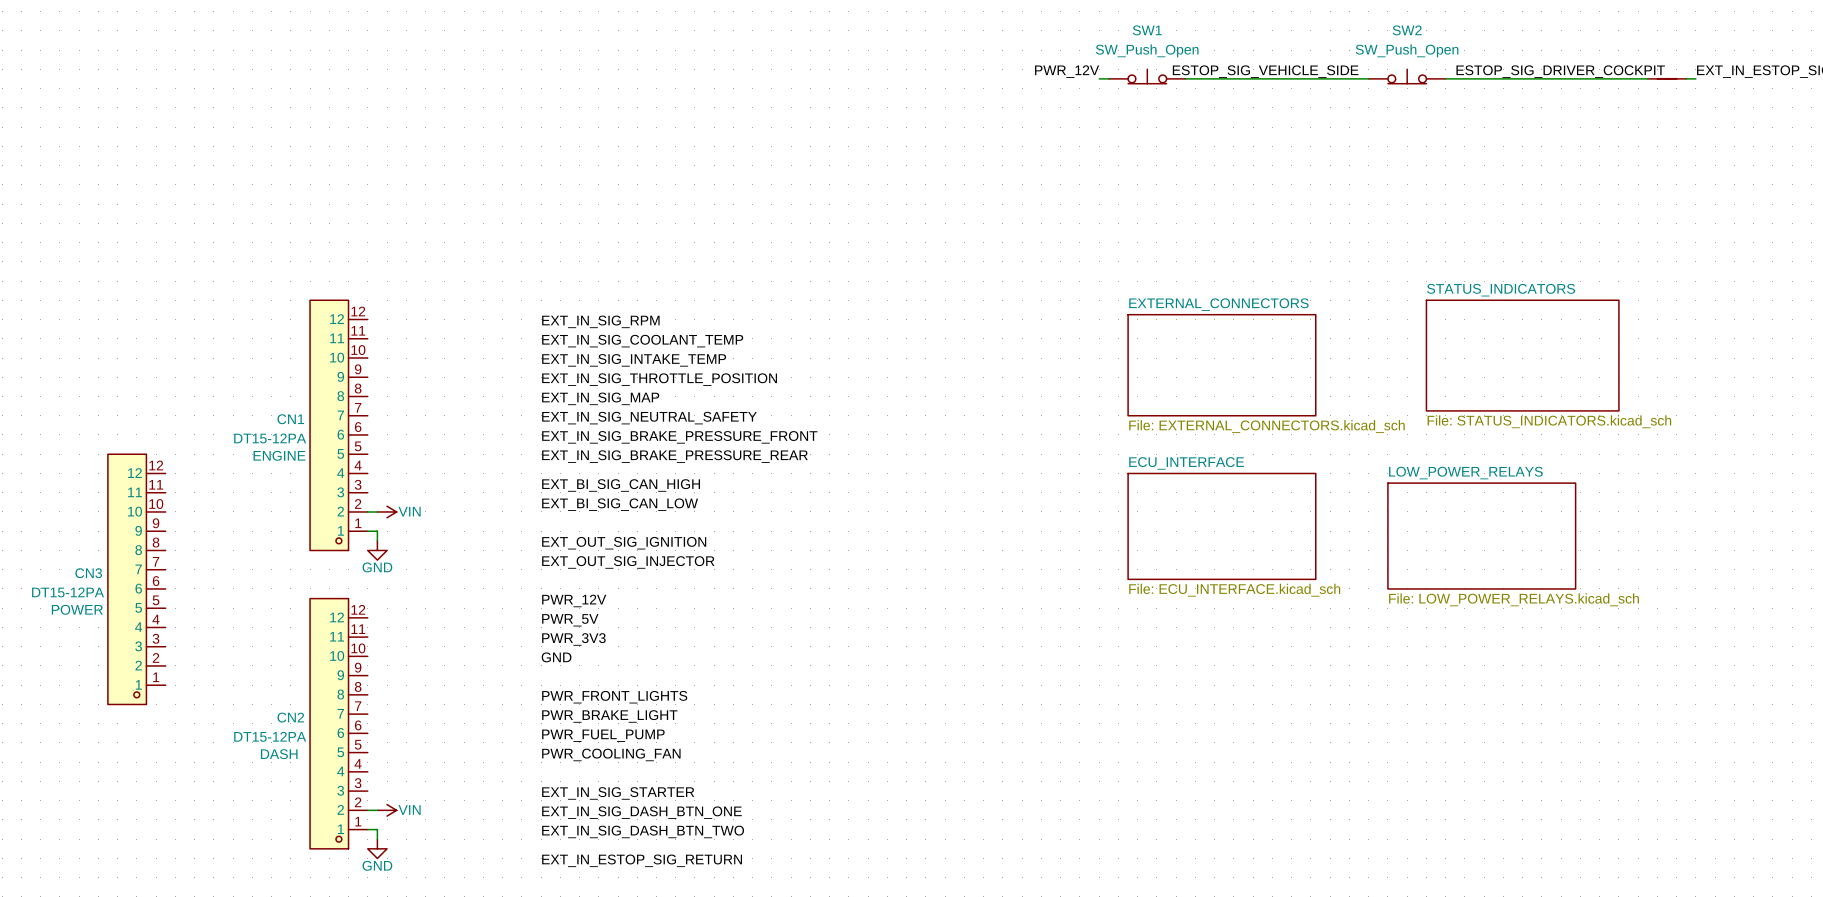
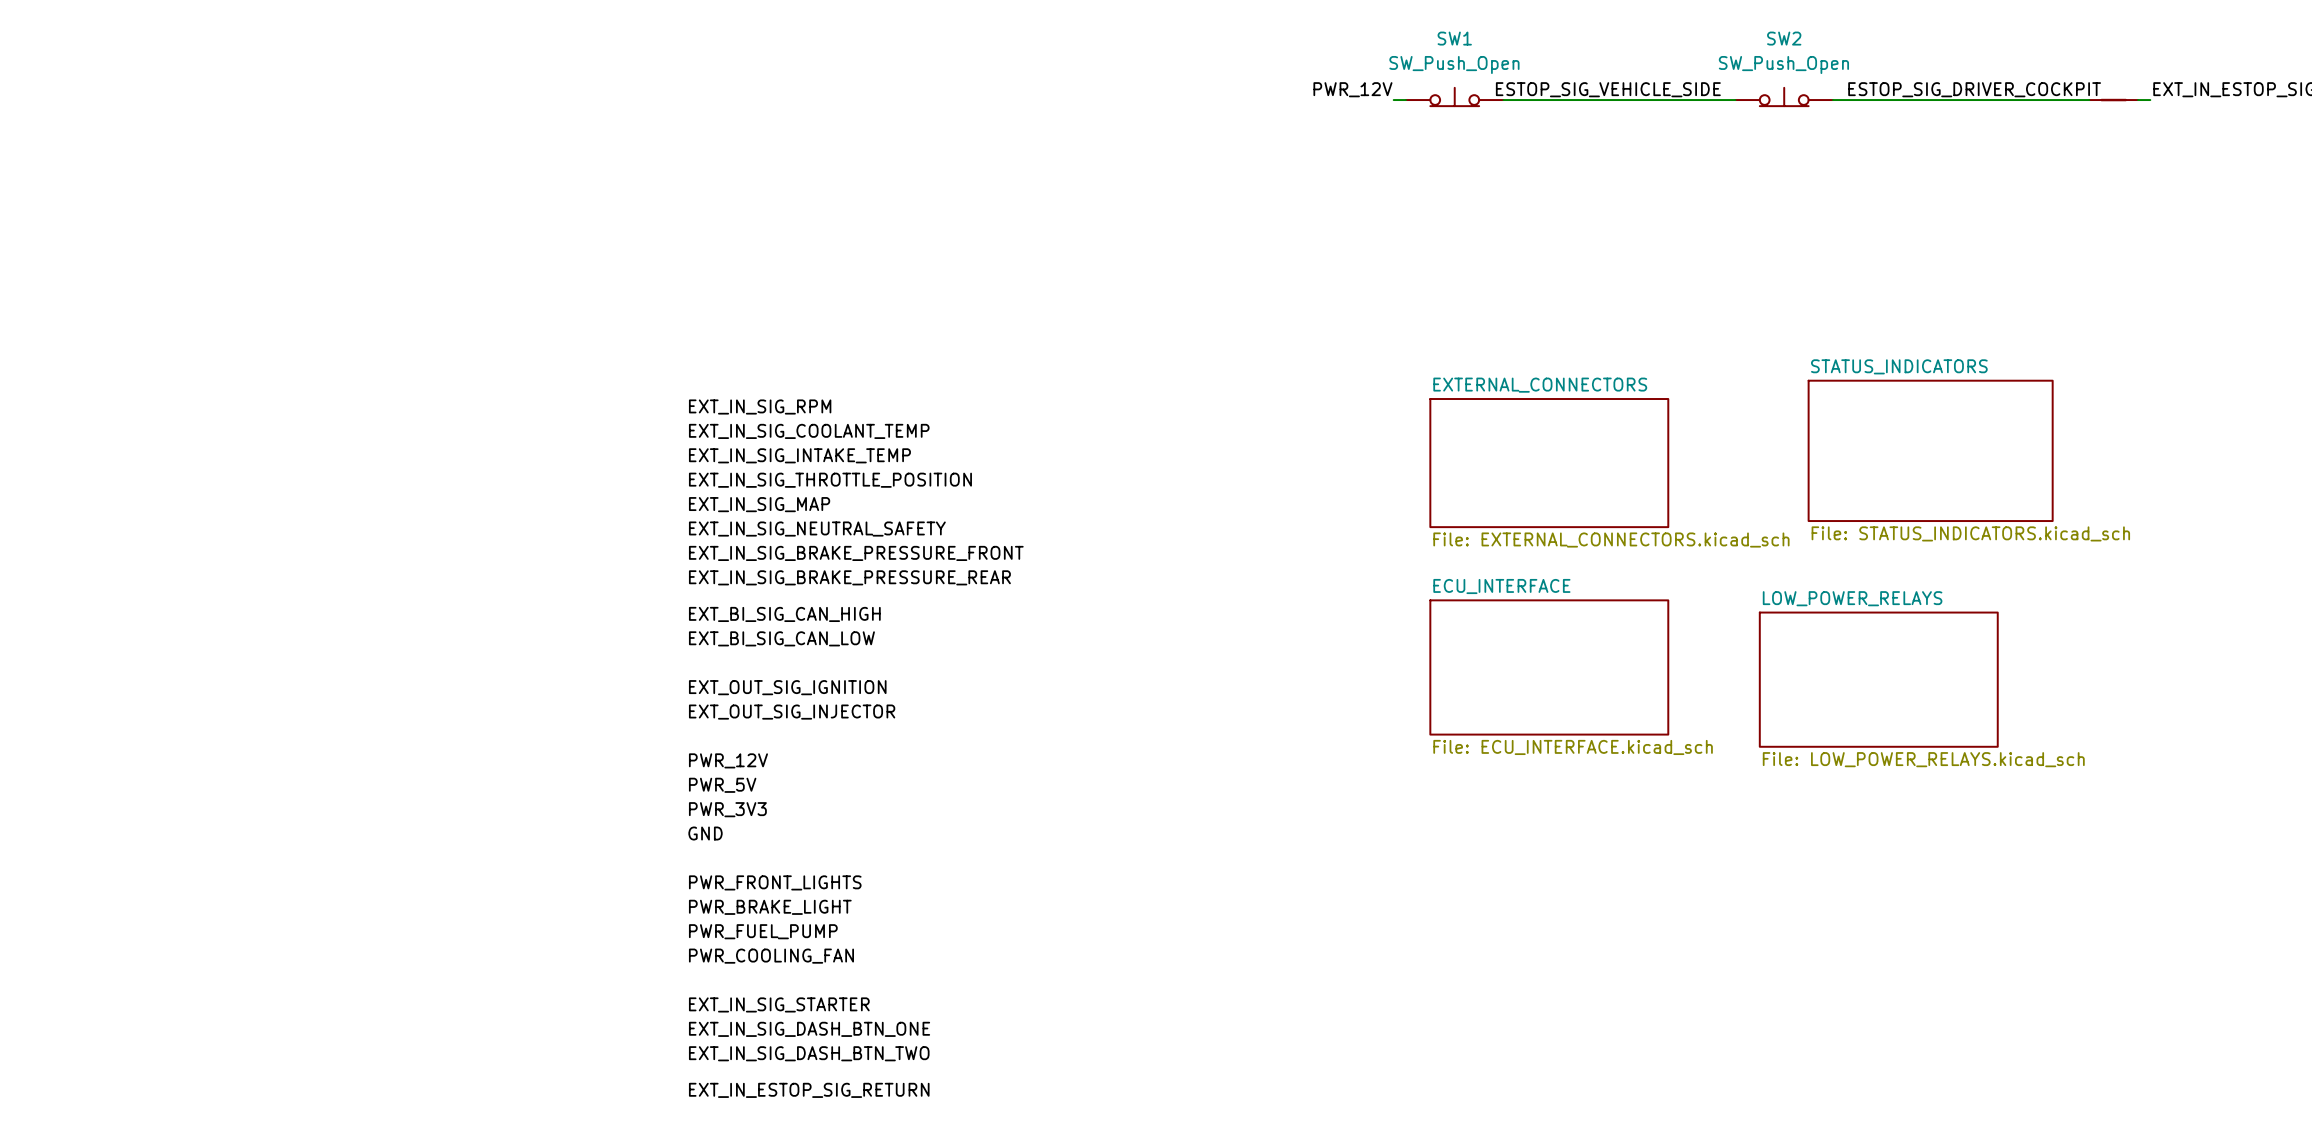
CN1: DT15-12PA (338, 425) -> none
wire: (367, 511) (377, 511) -> none
power symbol: VIN (387, 511) -> none
wire: (367, 531) (377, 531) (377, 540) -> none
power symbol: GND (377, 550) -> none
CN3: DT15-12PA (136, 579) -> none
CN2: DT15-12PA (338, 723) -> none
wire: (367, 810) (377, 810) -> none
power symbol: VIN (387, 810) -> none
wire: (367, 829) (377, 829) (377, 839) -> none
power symbol: GND (377, 848) -> none

